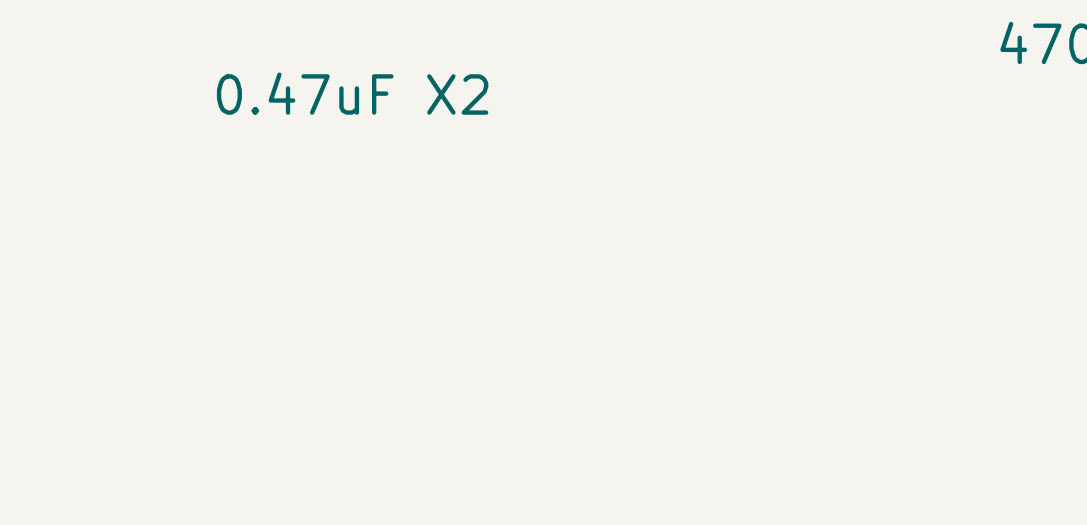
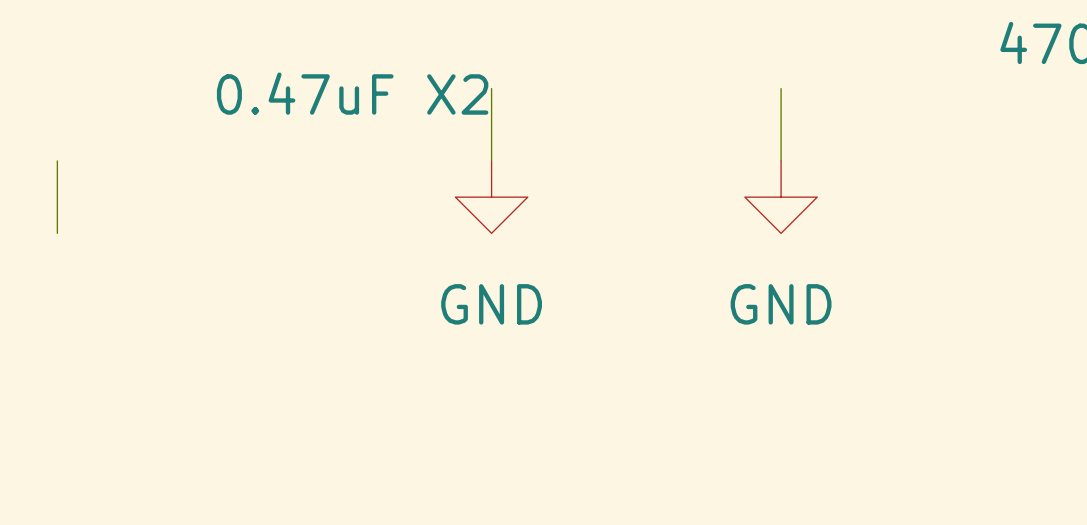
wire: none -> (491, 88) (491, 160)
wire: none -> (781, 88) (781, 160)
wire: none -> (57, 160) (57, 233)
power symbol: none -> GND (491, 197)
power symbol: none -> GND (781, 197)

